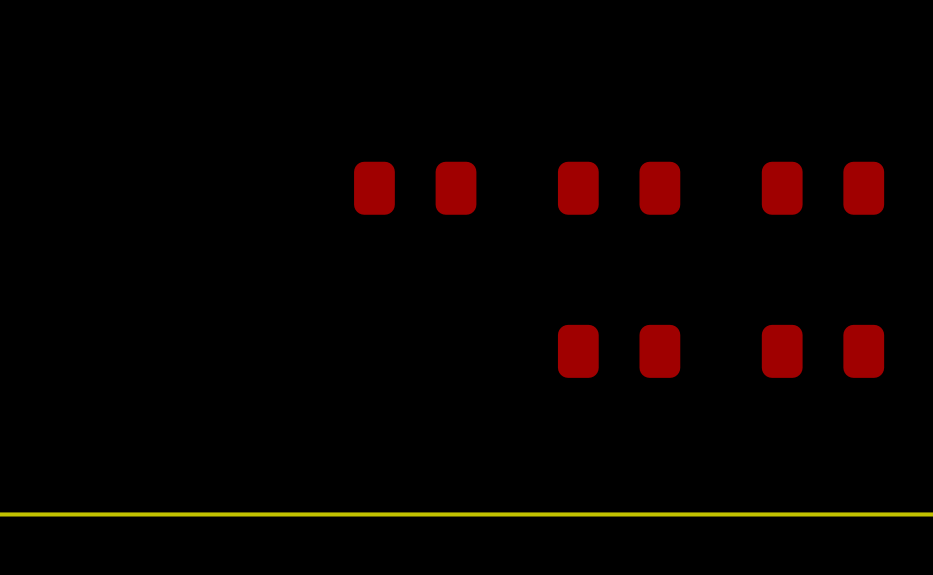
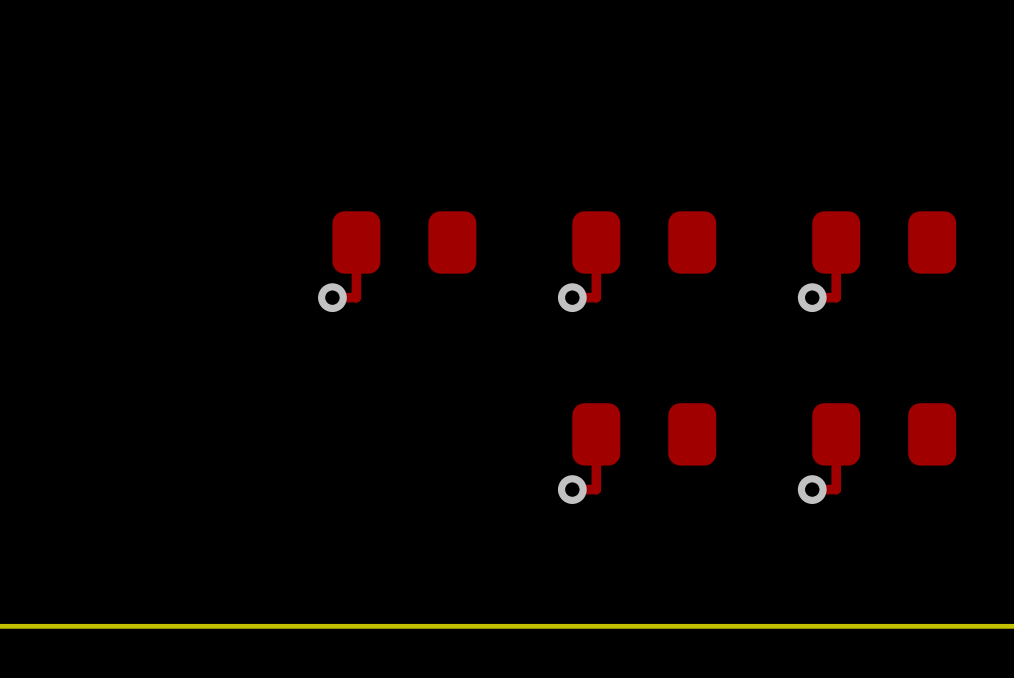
top track: none -> (356, 242) (356, 297) (332, 297)
top track: none -> (596, 242) (596, 297) (572, 297)
top track: none -> (836, 242) (836, 297) (812, 297)
via: none -> (332, 297)
via: none -> (572, 297)
via: none -> (812, 297)
top track: none -> (596, 434) (596, 489) (572, 489)
top track: none -> (836, 434) (836, 489) (812, 489)
via: none -> (572, 489)
via: none -> (812, 489)

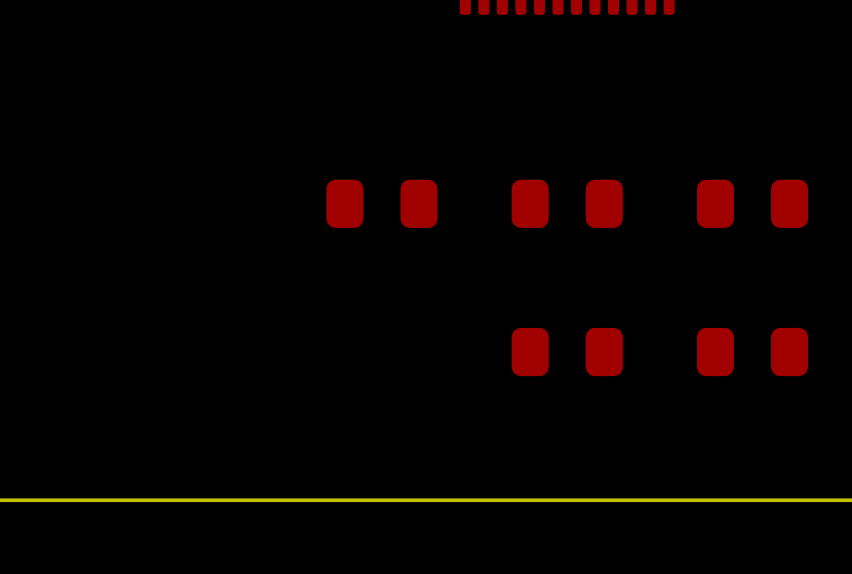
top track: (356, 242) (356, 297) (332, 297) -> none
top track: (596, 242) (596, 297) (572, 297) -> none
top track: (836, 242) (836, 297) (812, 297) -> none
via: (332, 297) -> none
via: (572, 297) -> none
via: (812, 297) -> none
top track: (596, 434) (596, 489) (572, 489) -> none
top track: (836, 434) (836, 489) (812, 489) -> none
via: (572, 489) -> none
via: (812, 489) -> none

